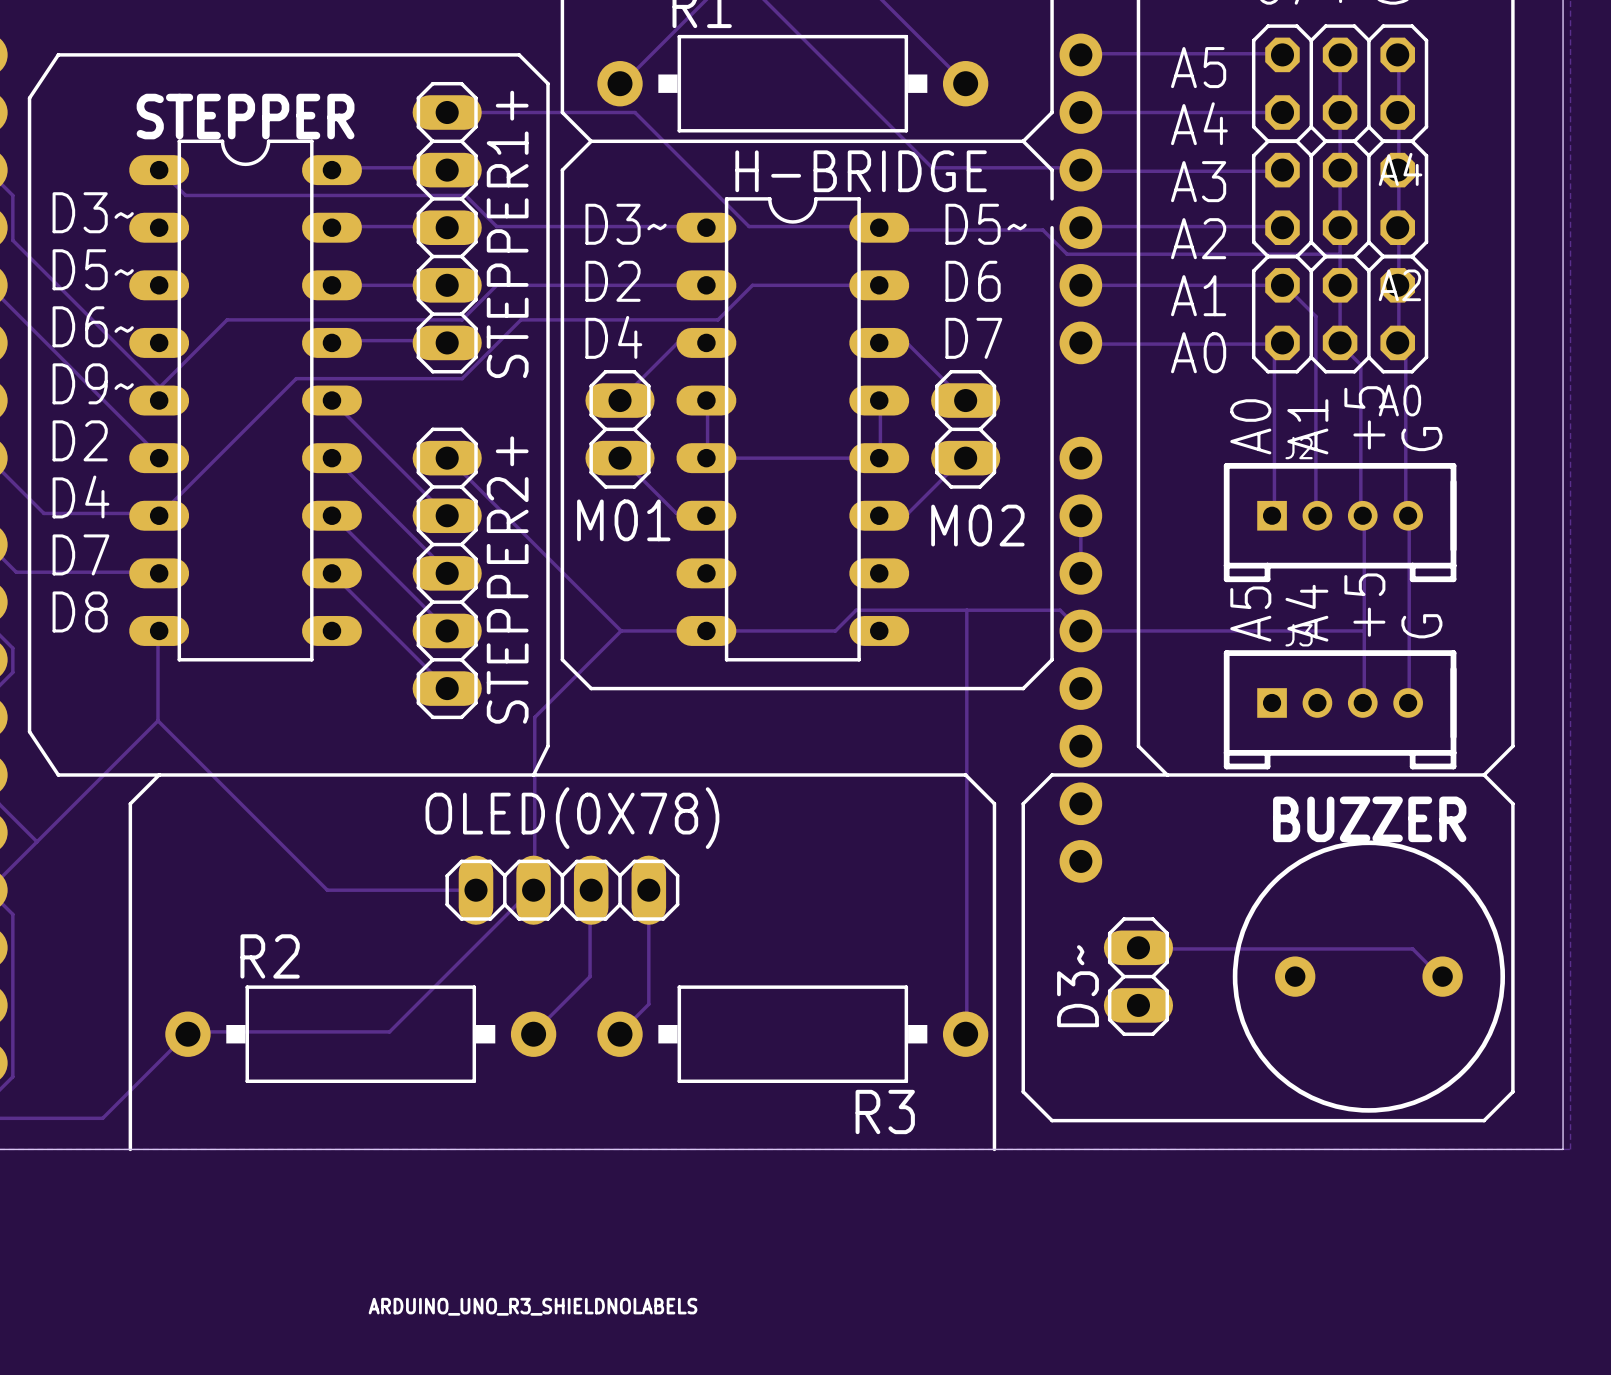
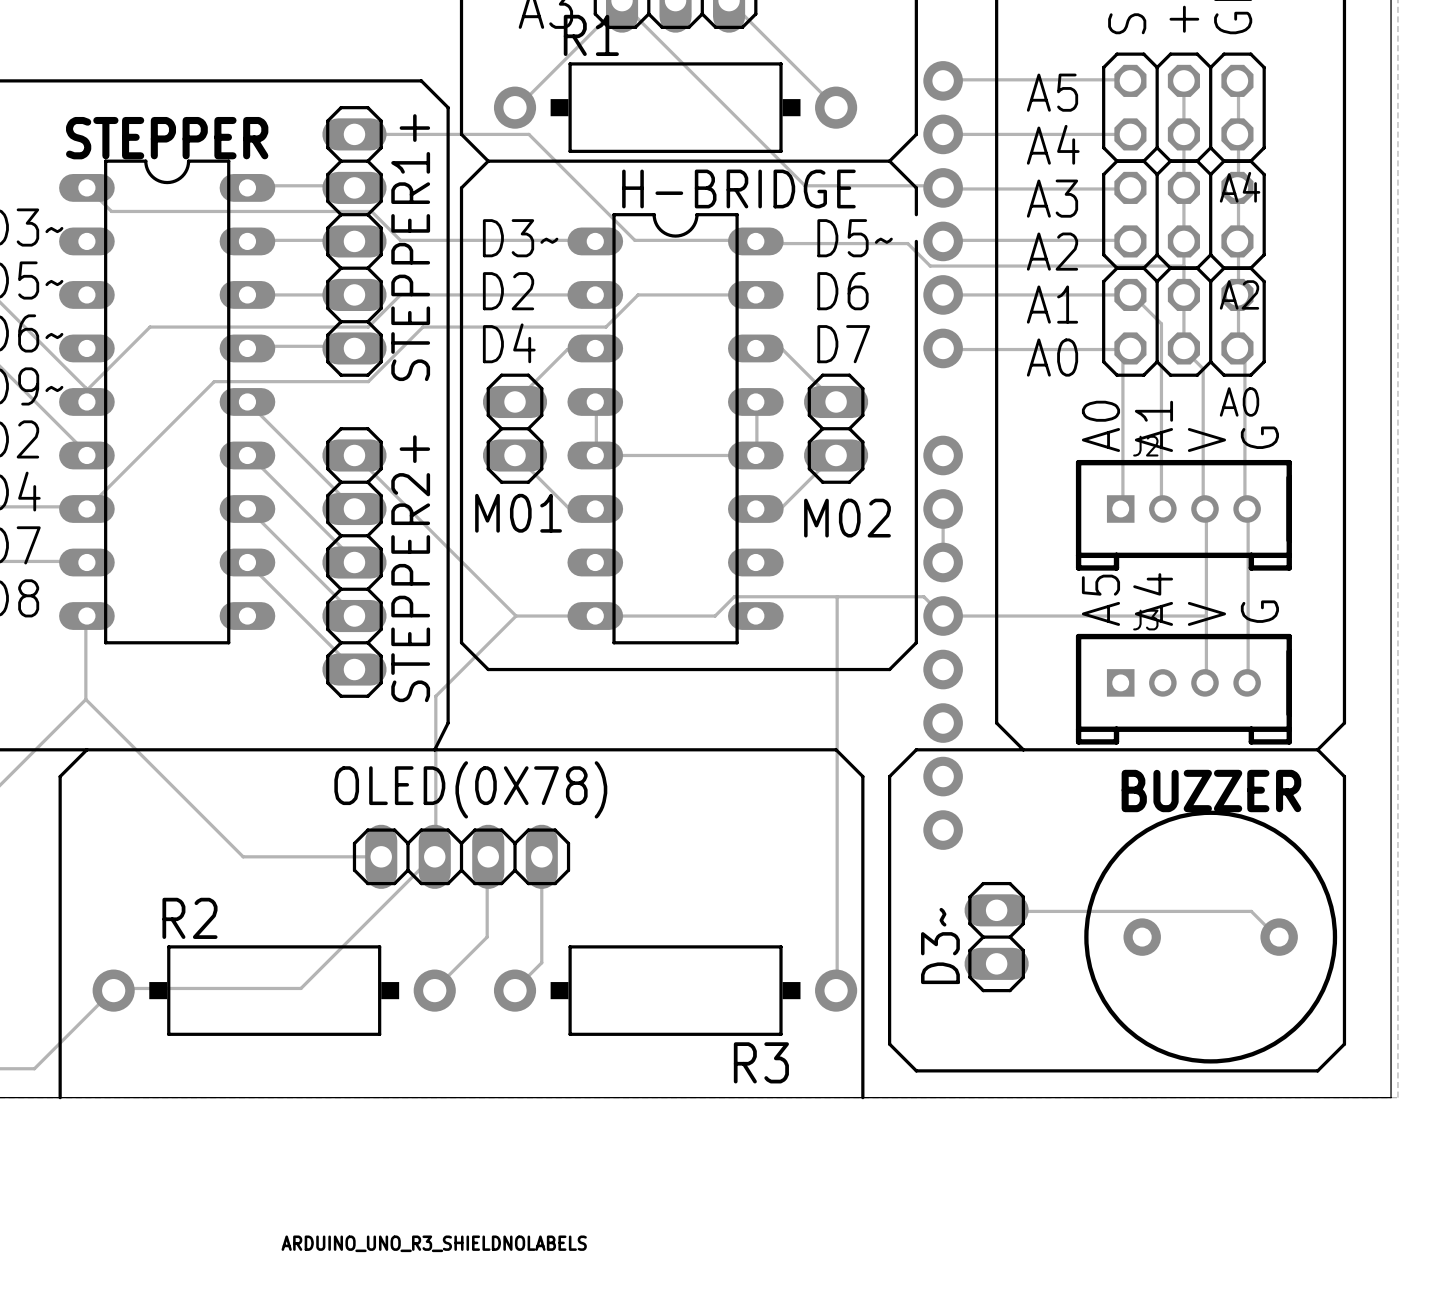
text: +5 (1364, 417) -> V (1206, 440)
text: +5 (1364, 605) -> V (1206, 613)

